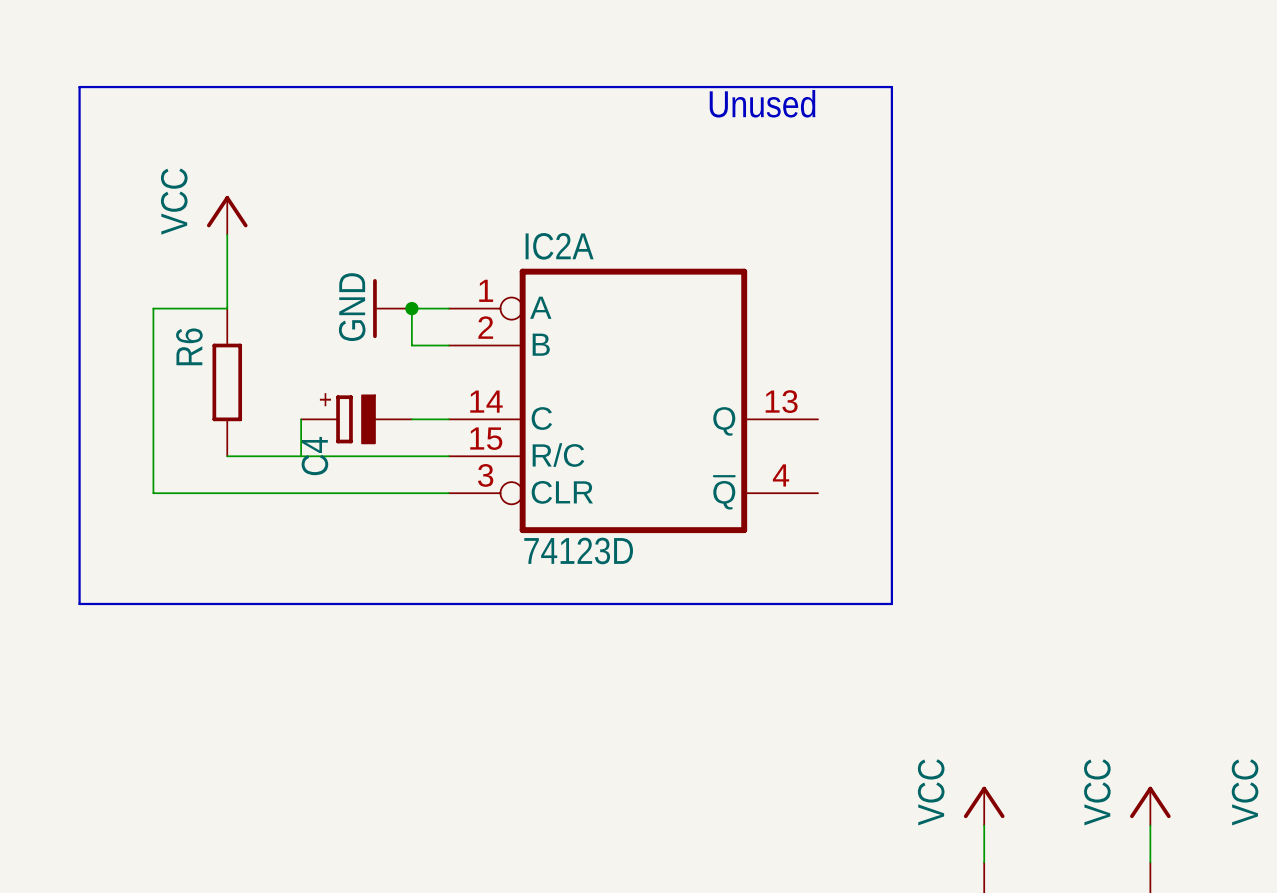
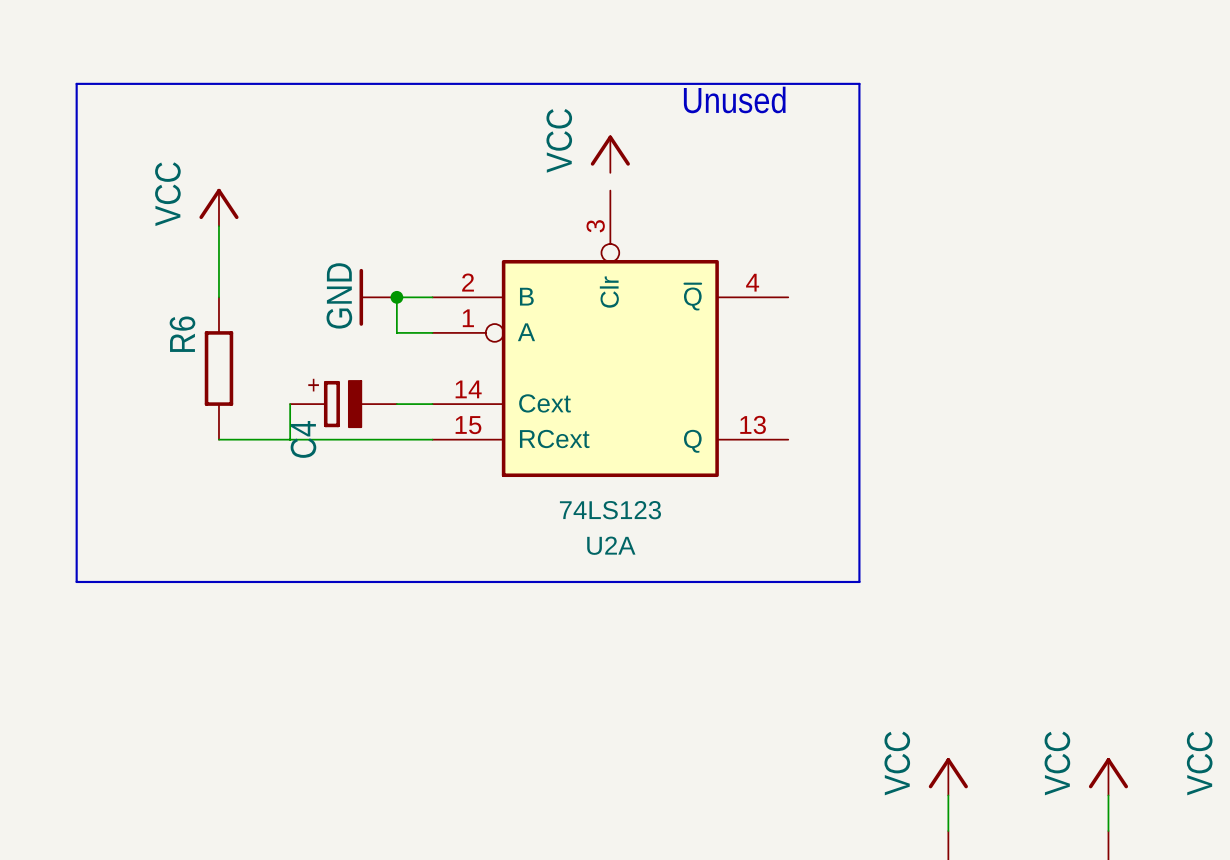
power symbol: none -> VCC (610, 154)
wire: (227, 308) (153, 308) (153, 493) (448, 493) -> none
U2A: none -> 74LS123 (610, 333)
IC2A: 74123D (633, 400) -> none

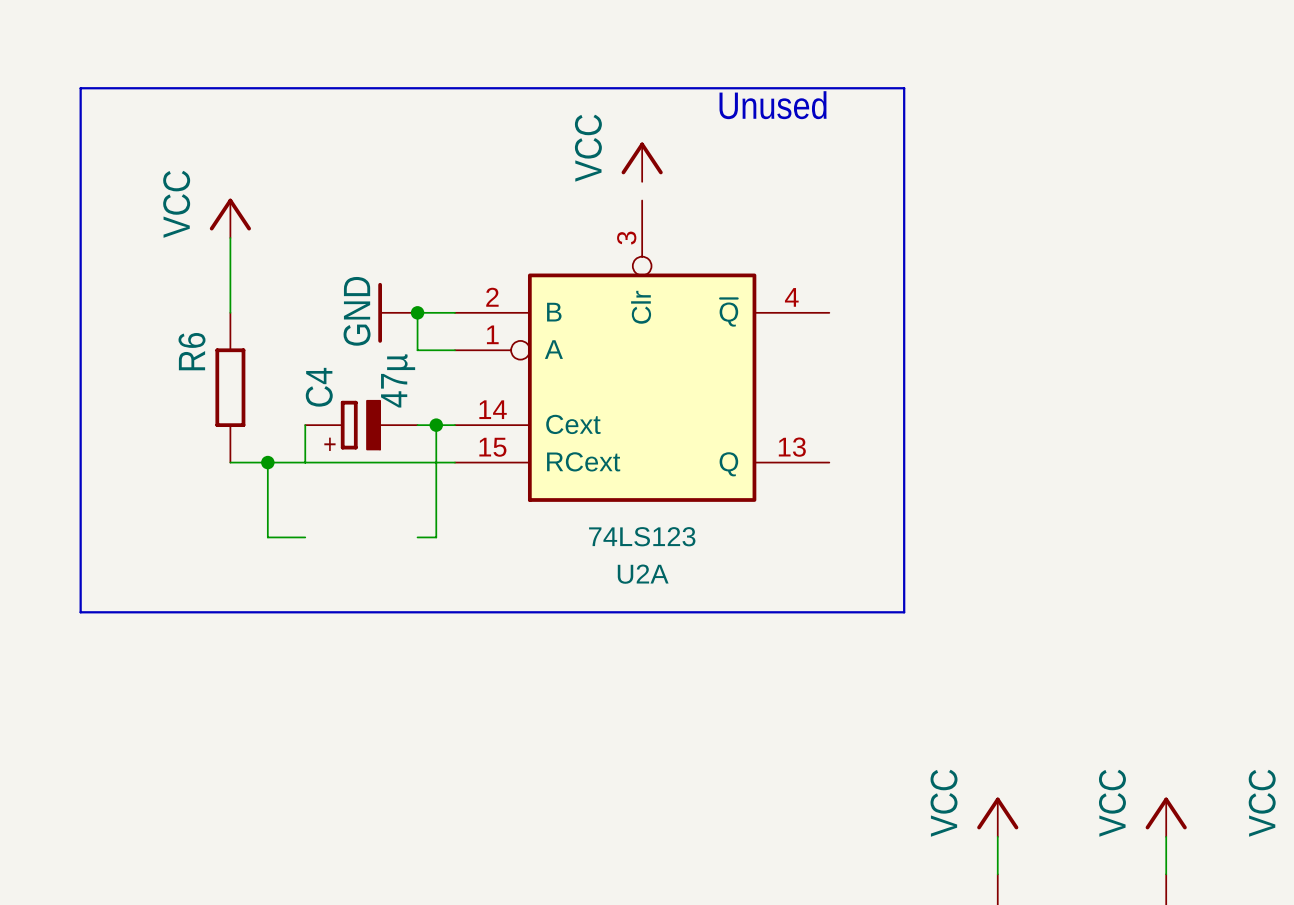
C4 value: none -> 47µ (398, 380)
C4 flip: as is (342, 404) -> up-down (360, 425)
wire: none -> (436, 425) (436, 537) (417, 537)
junction: none -> (436, 425)
wire: none -> (267, 462) (267, 537) (305, 537)
junction: none -> (267, 462)

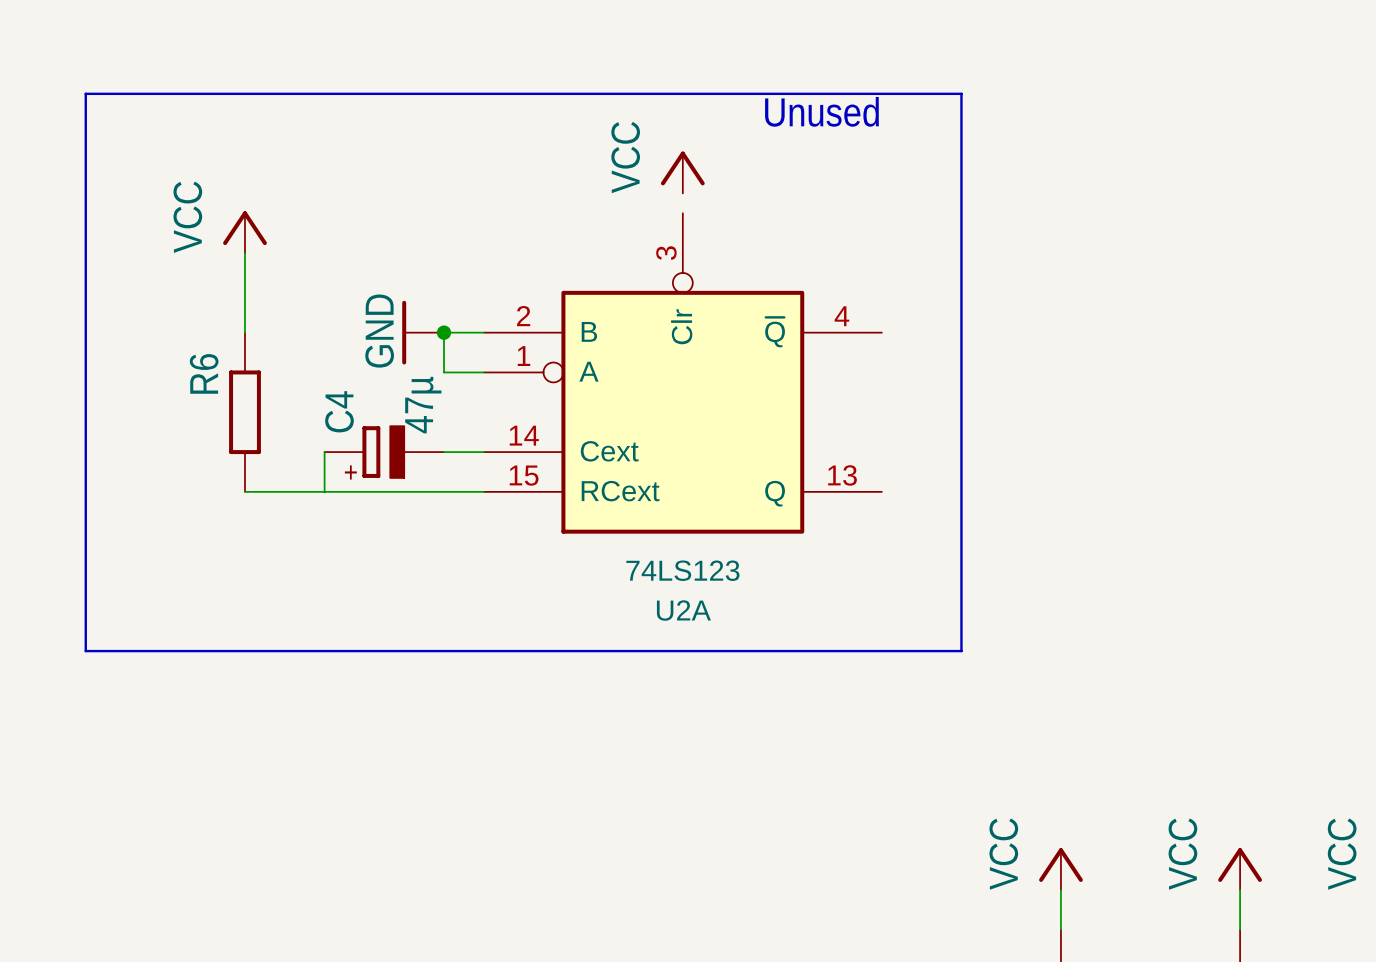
wire: (436, 425) (436, 537) (417, 537) -> none
junction: (436, 425) -> none
wire: (267, 462) (267, 537) (305, 537) -> none
junction: (267, 462) -> none

